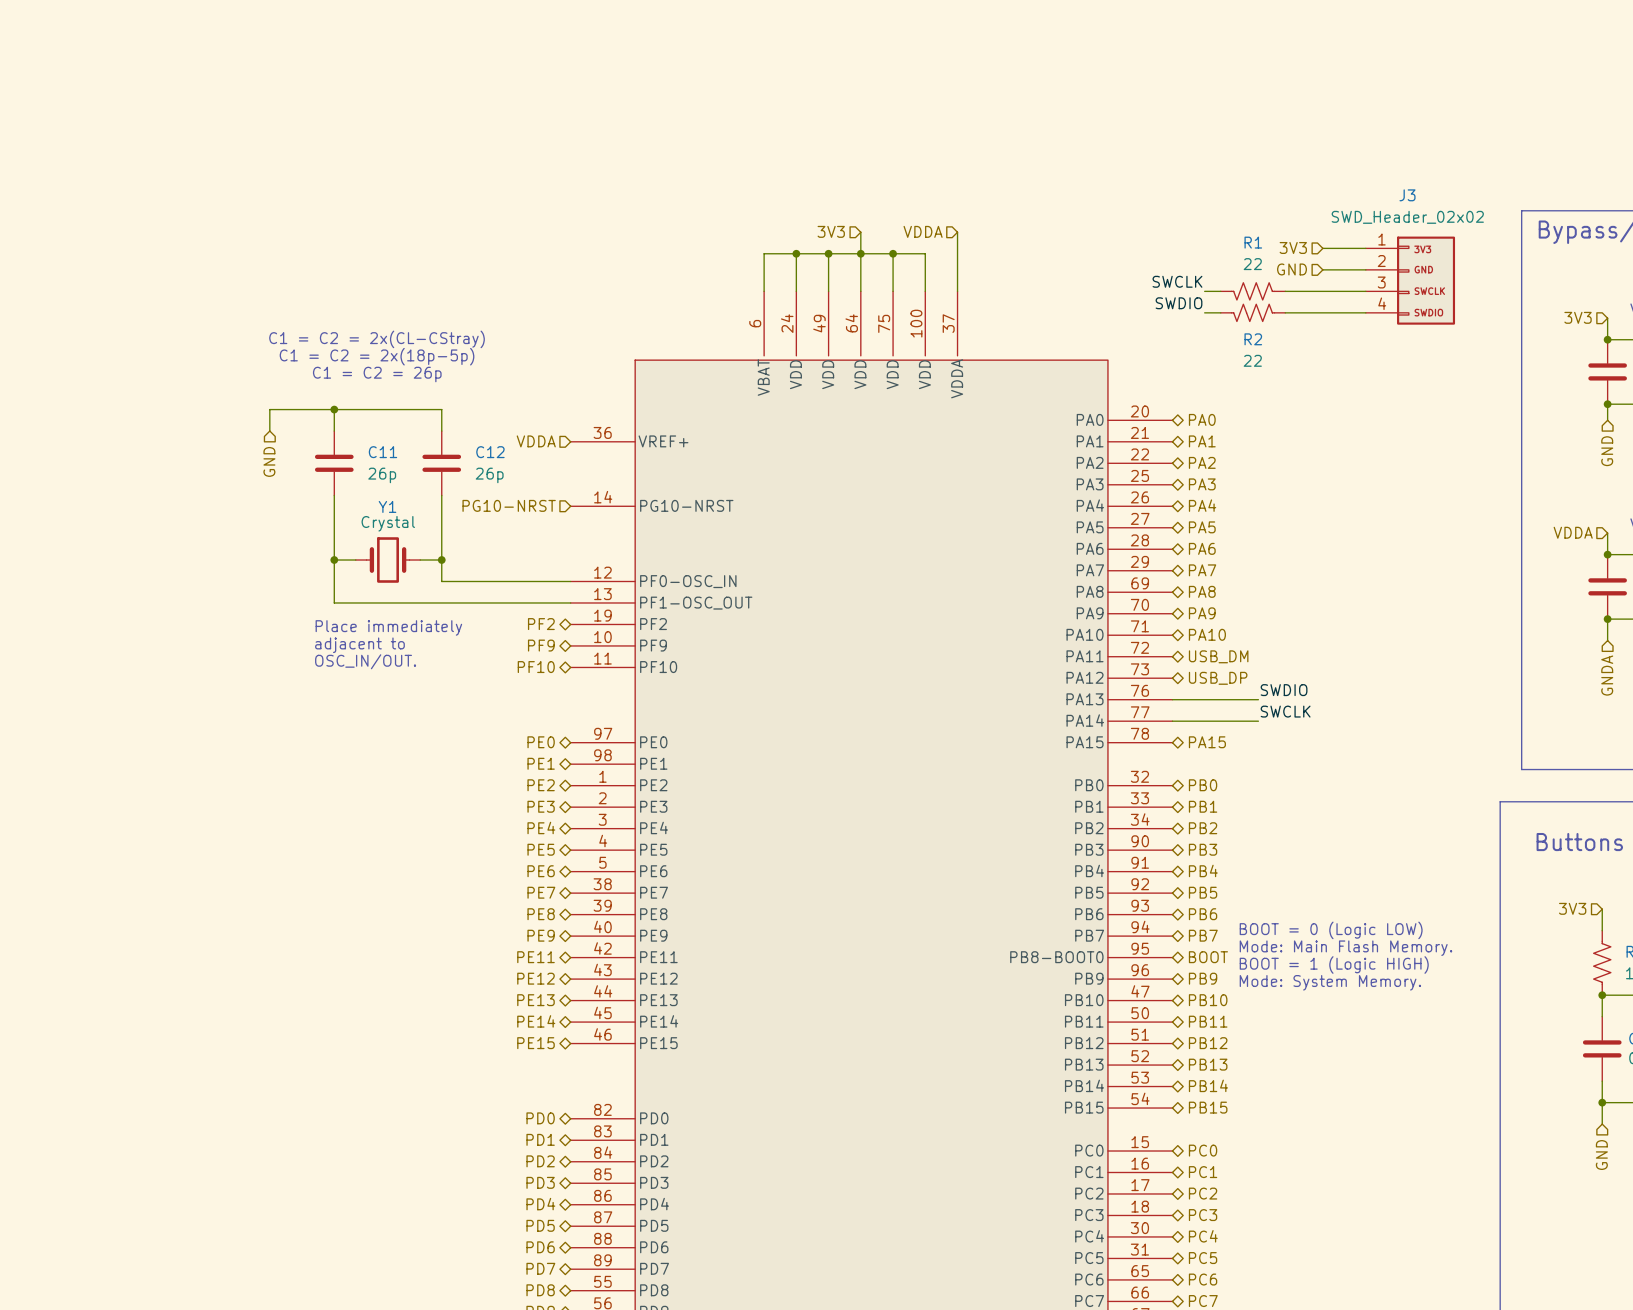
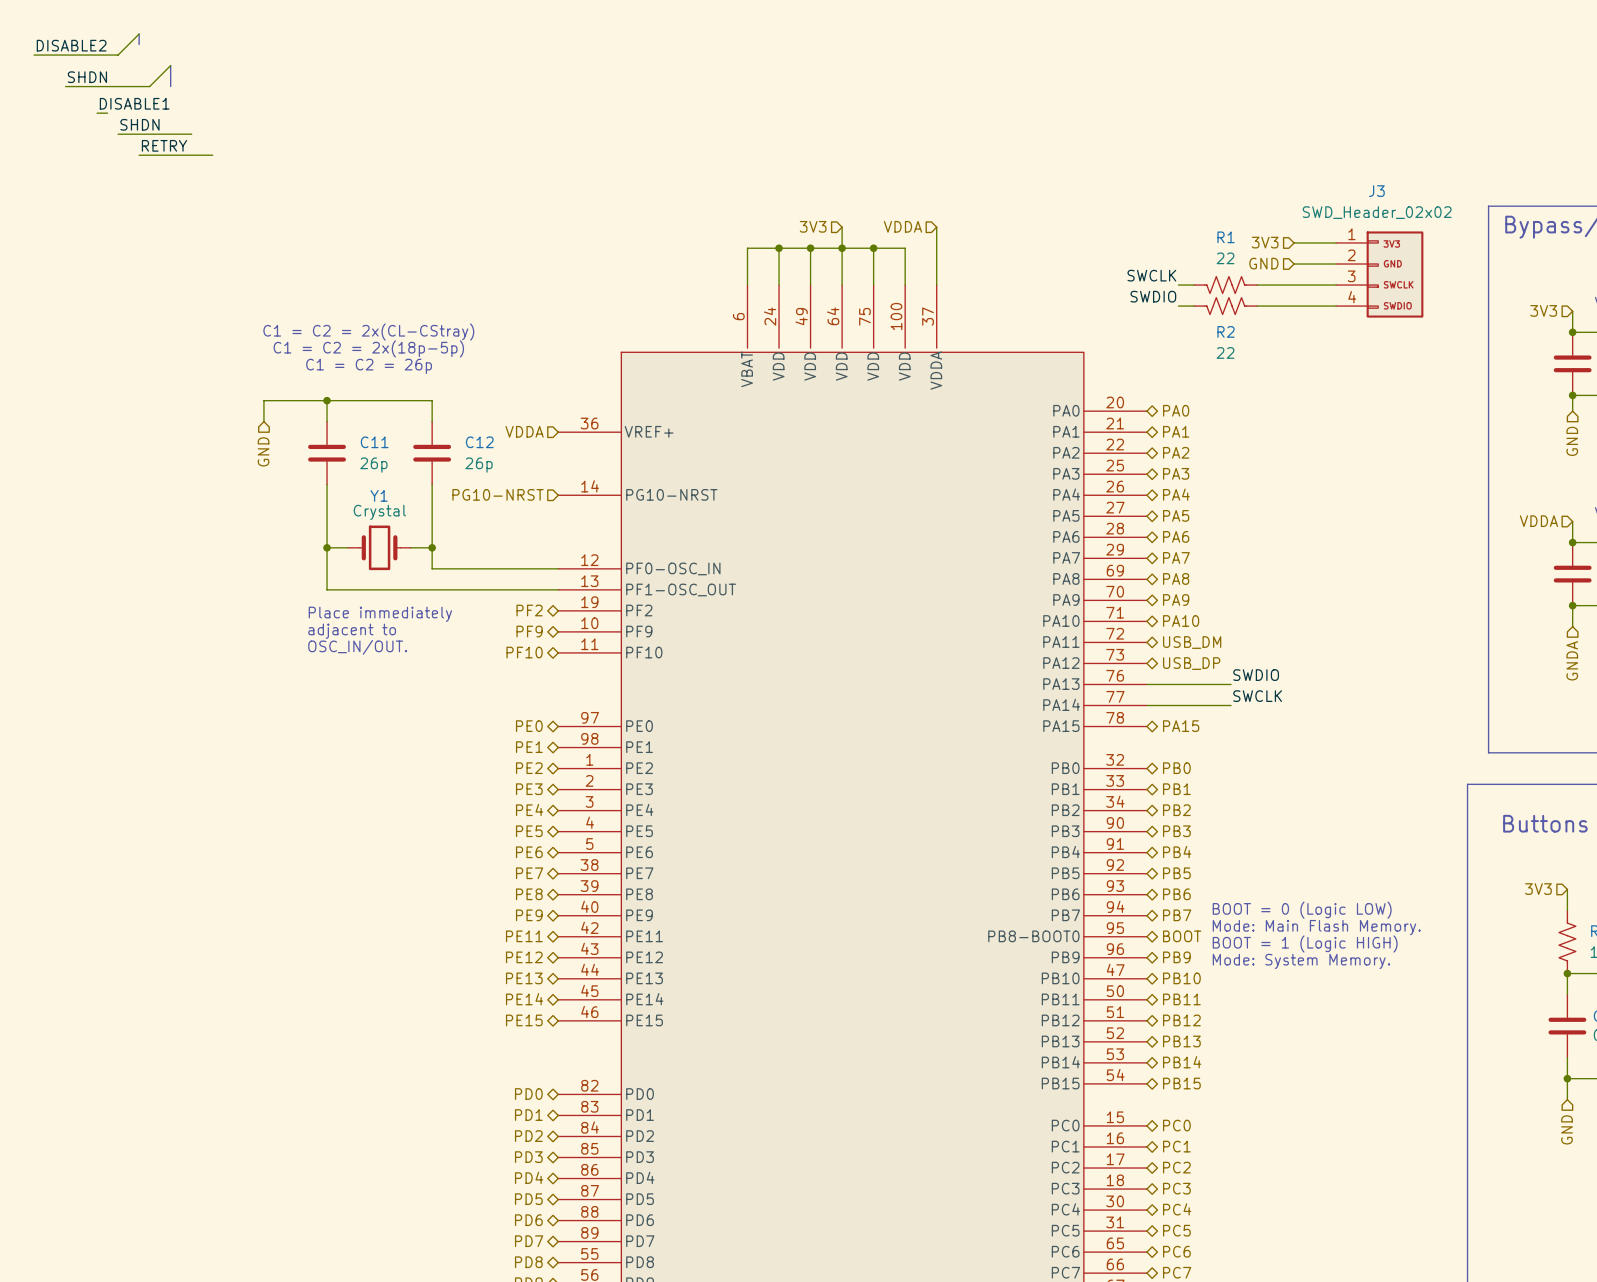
wire: none -> (139, 34) (118, 55) (34, 55)
bus: none -> (139, 34) (139, 44)
label: none -> DISABLE2 (71, 45)
wire: none -> (170, 65) (149, 86) (65, 86)
bus: none -> (170, 65) (170, 86)
label: none -> SHDN (87, 77)
label: none -> DISABLE1 (134, 103)
wire: none -> (97, 113) (107, 113)
label: none -> SHDN (139, 124)
wire: none -> (118, 134) (191, 134)
label: none -> RETRY (164, 145)
wire: none -> (139, 155) (212, 155)

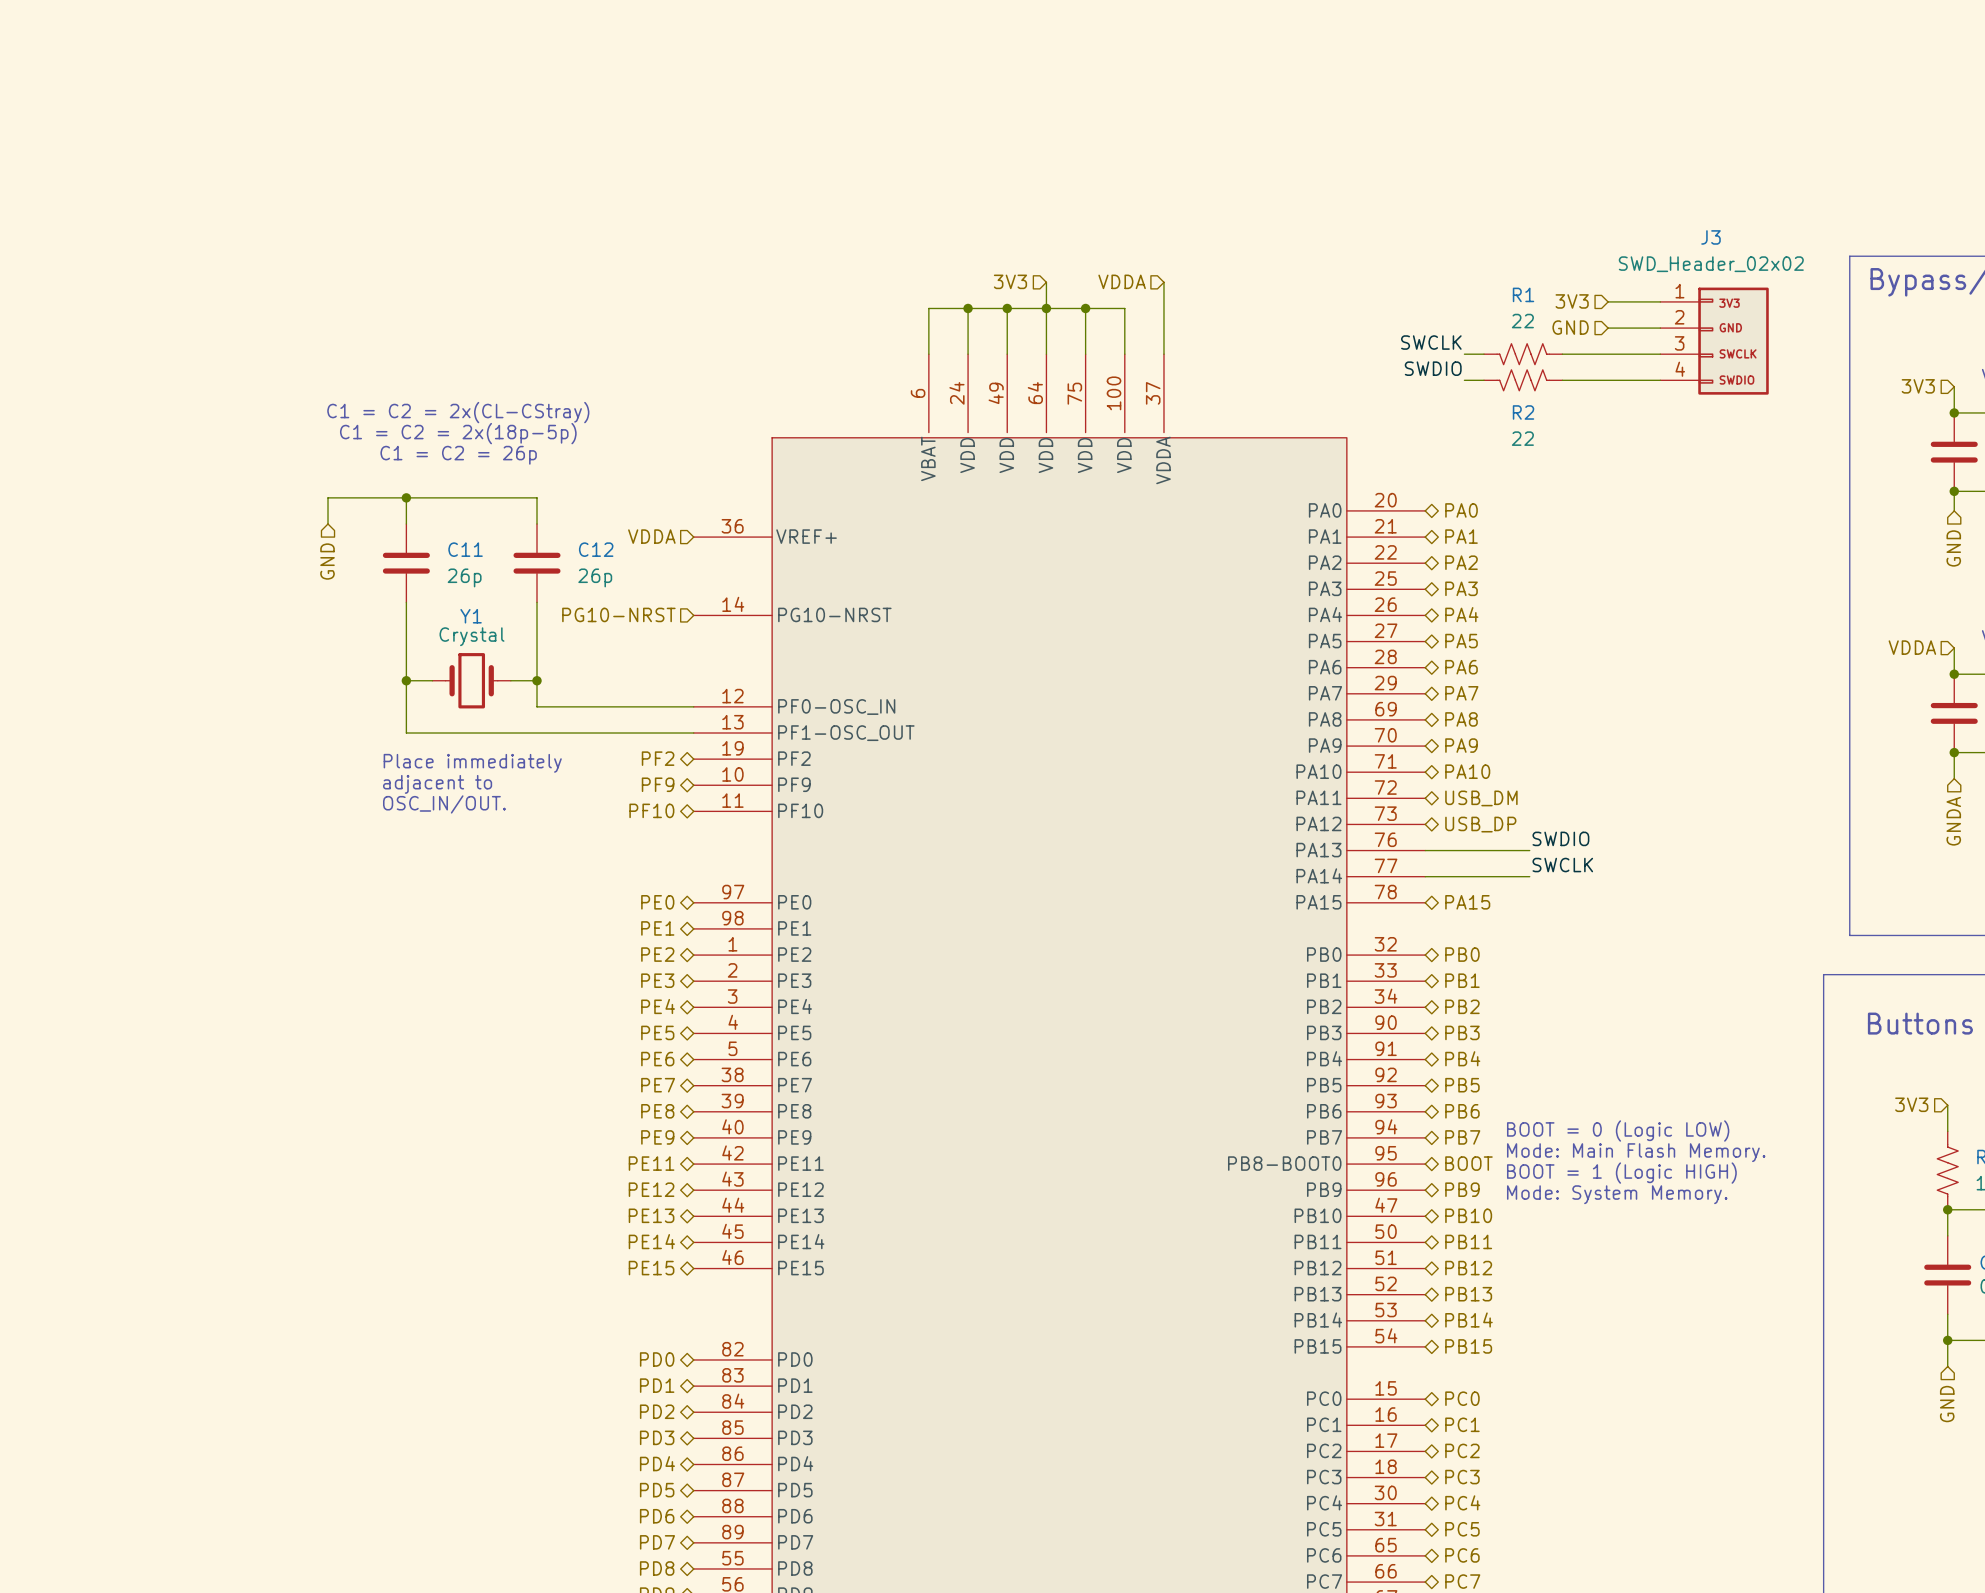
wire: (139, 34) (118, 55) (34, 55) -> none
bus: (139, 34) (139, 44) -> none
label: DISABLE2 (71, 45) -> none
wire: (170, 65) (149, 86) (65, 86) -> none
bus: (170, 65) (170, 86) -> none
label: SHDN (87, 77) -> none
label: DISABLE1 (134, 103) -> none
wire: (97, 113) (107, 113) -> none
label: SHDN (139, 124) -> none
wire: (118, 134) (191, 134) -> none
label: RETRY (164, 145) -> none
wire: (139, 155) (212, 155) -> none

